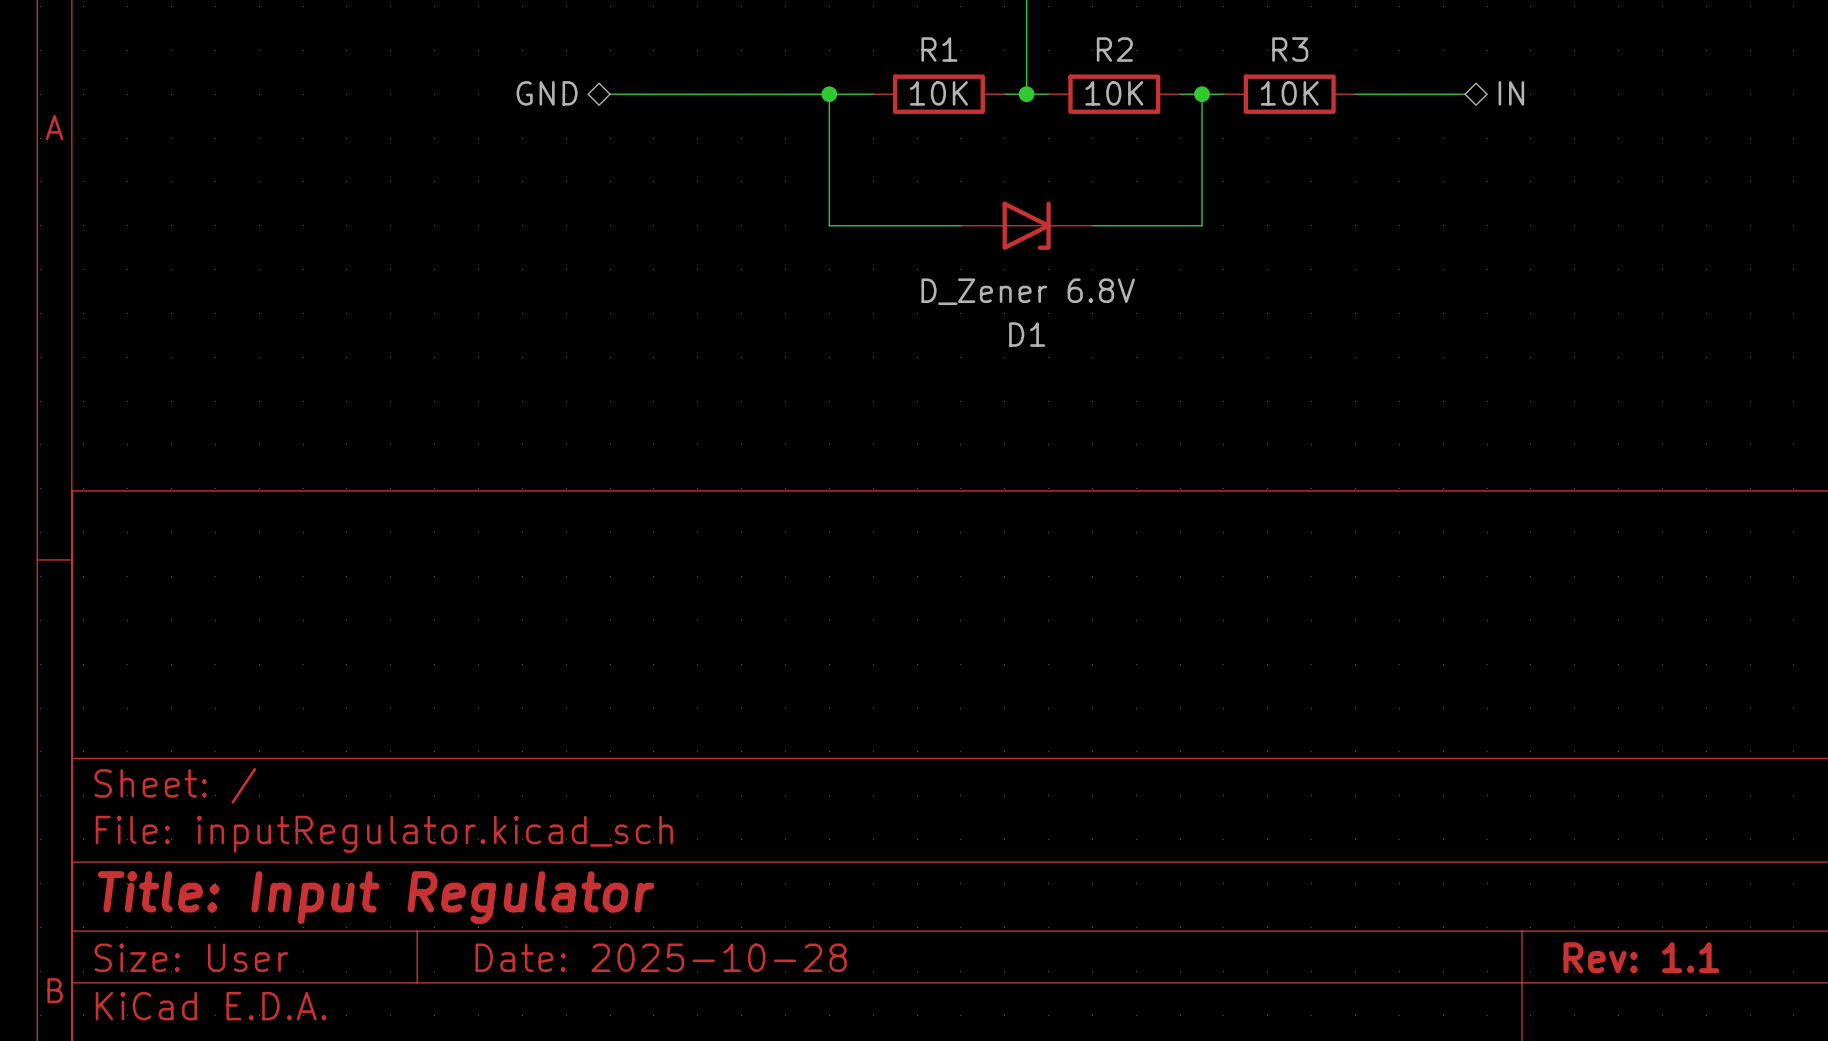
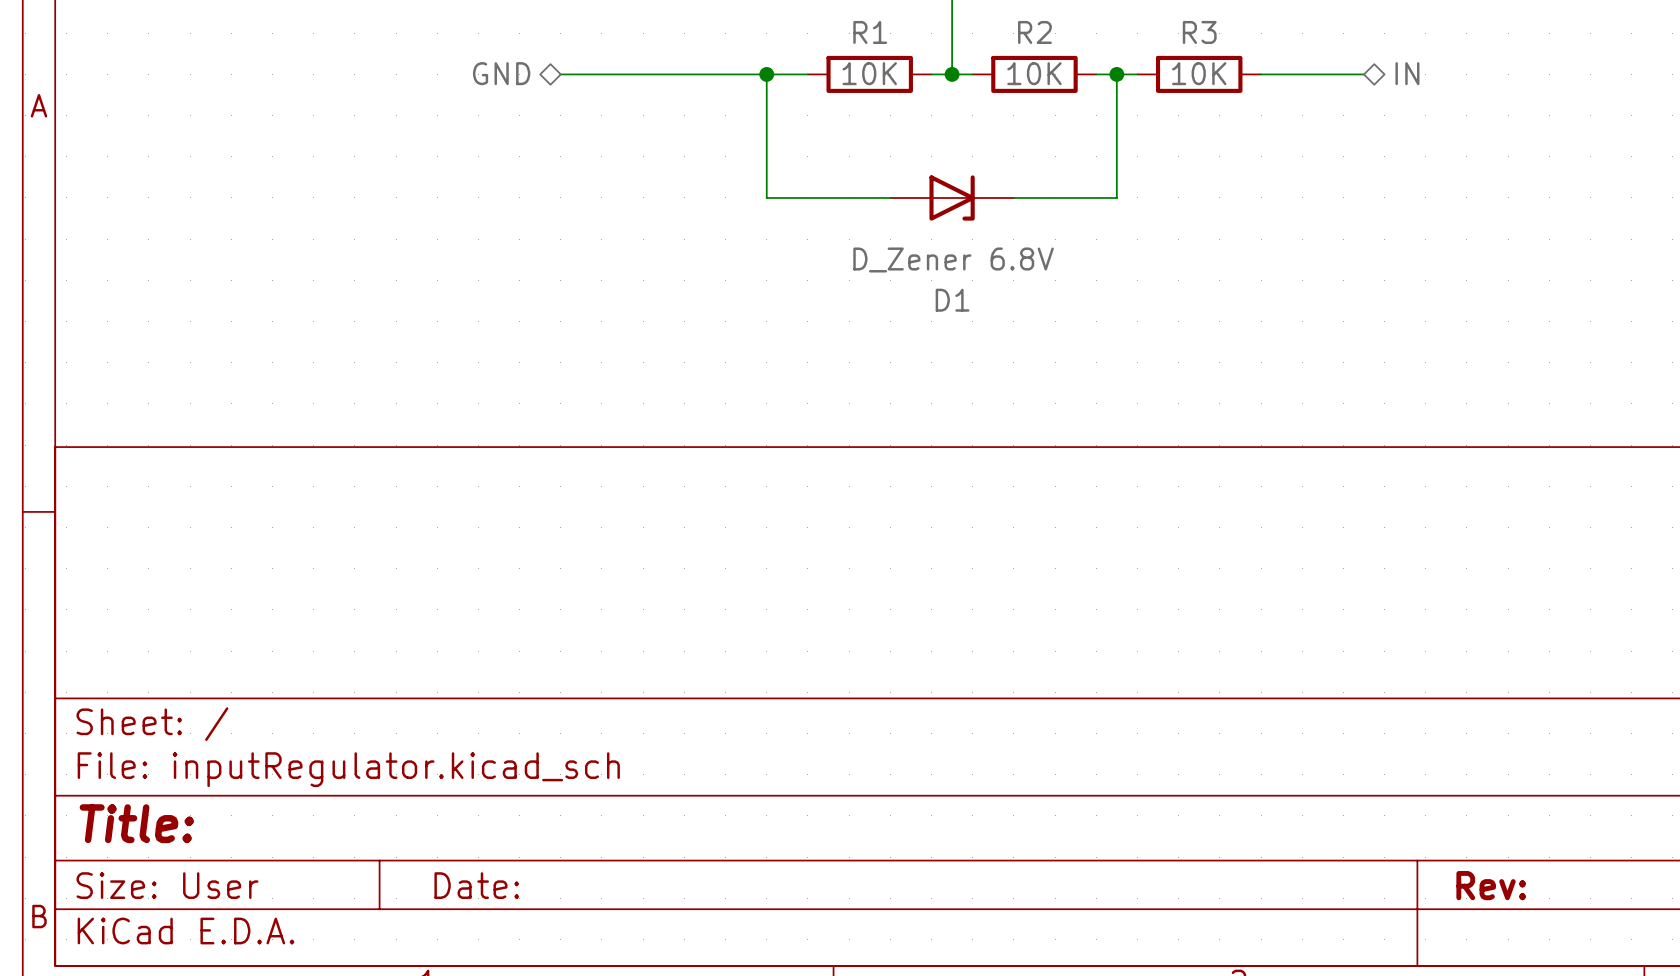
title block: Title: Input Regulator (375, 897) -> Title: (136, 823)
title block: Date: 2025-10-28 (661, 957) -> Date: (476, 885)
title block: Rev: 1.1 (1641, 957) -> Rev: (1491, 885)

